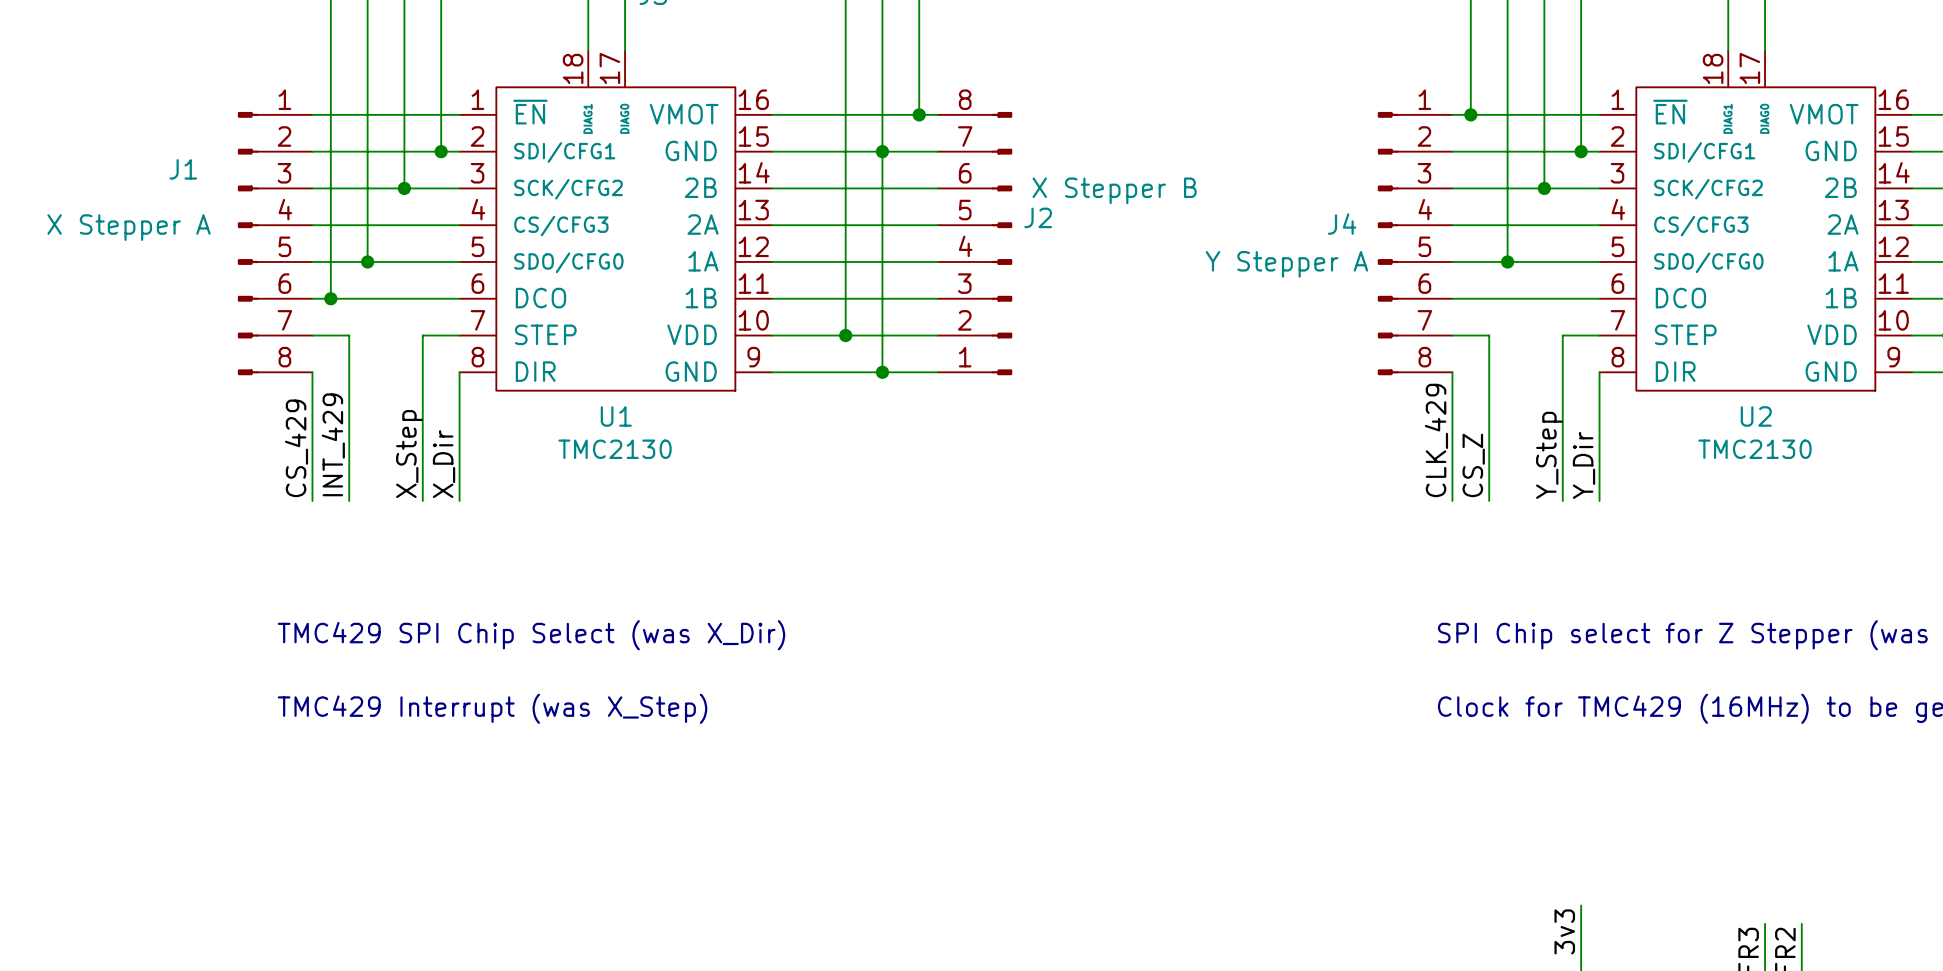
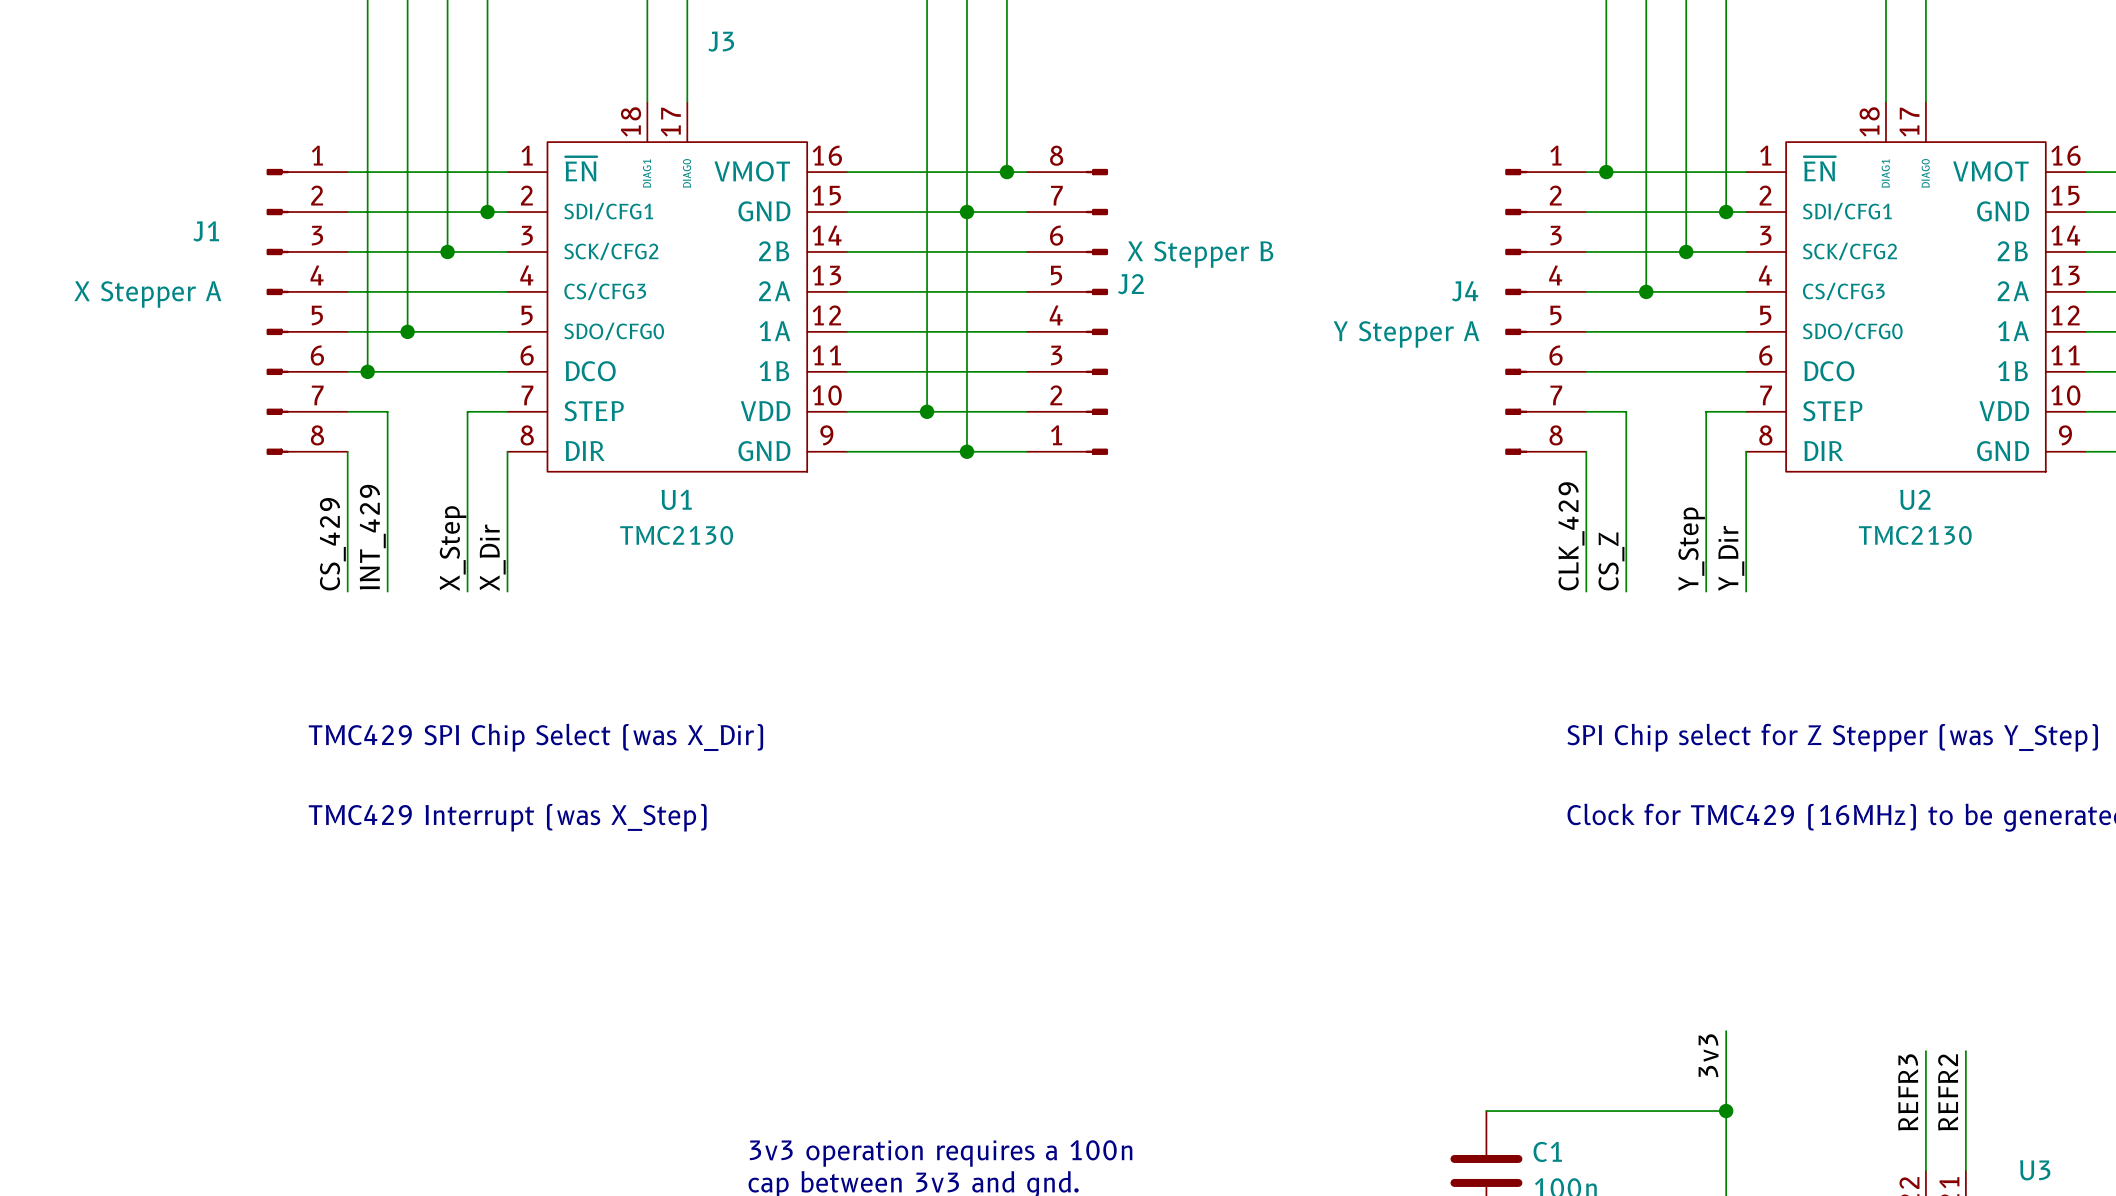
wire: (1507, 225) (1507, 261) -> none
junction position: (1507, 261) -> (1646, 291)

